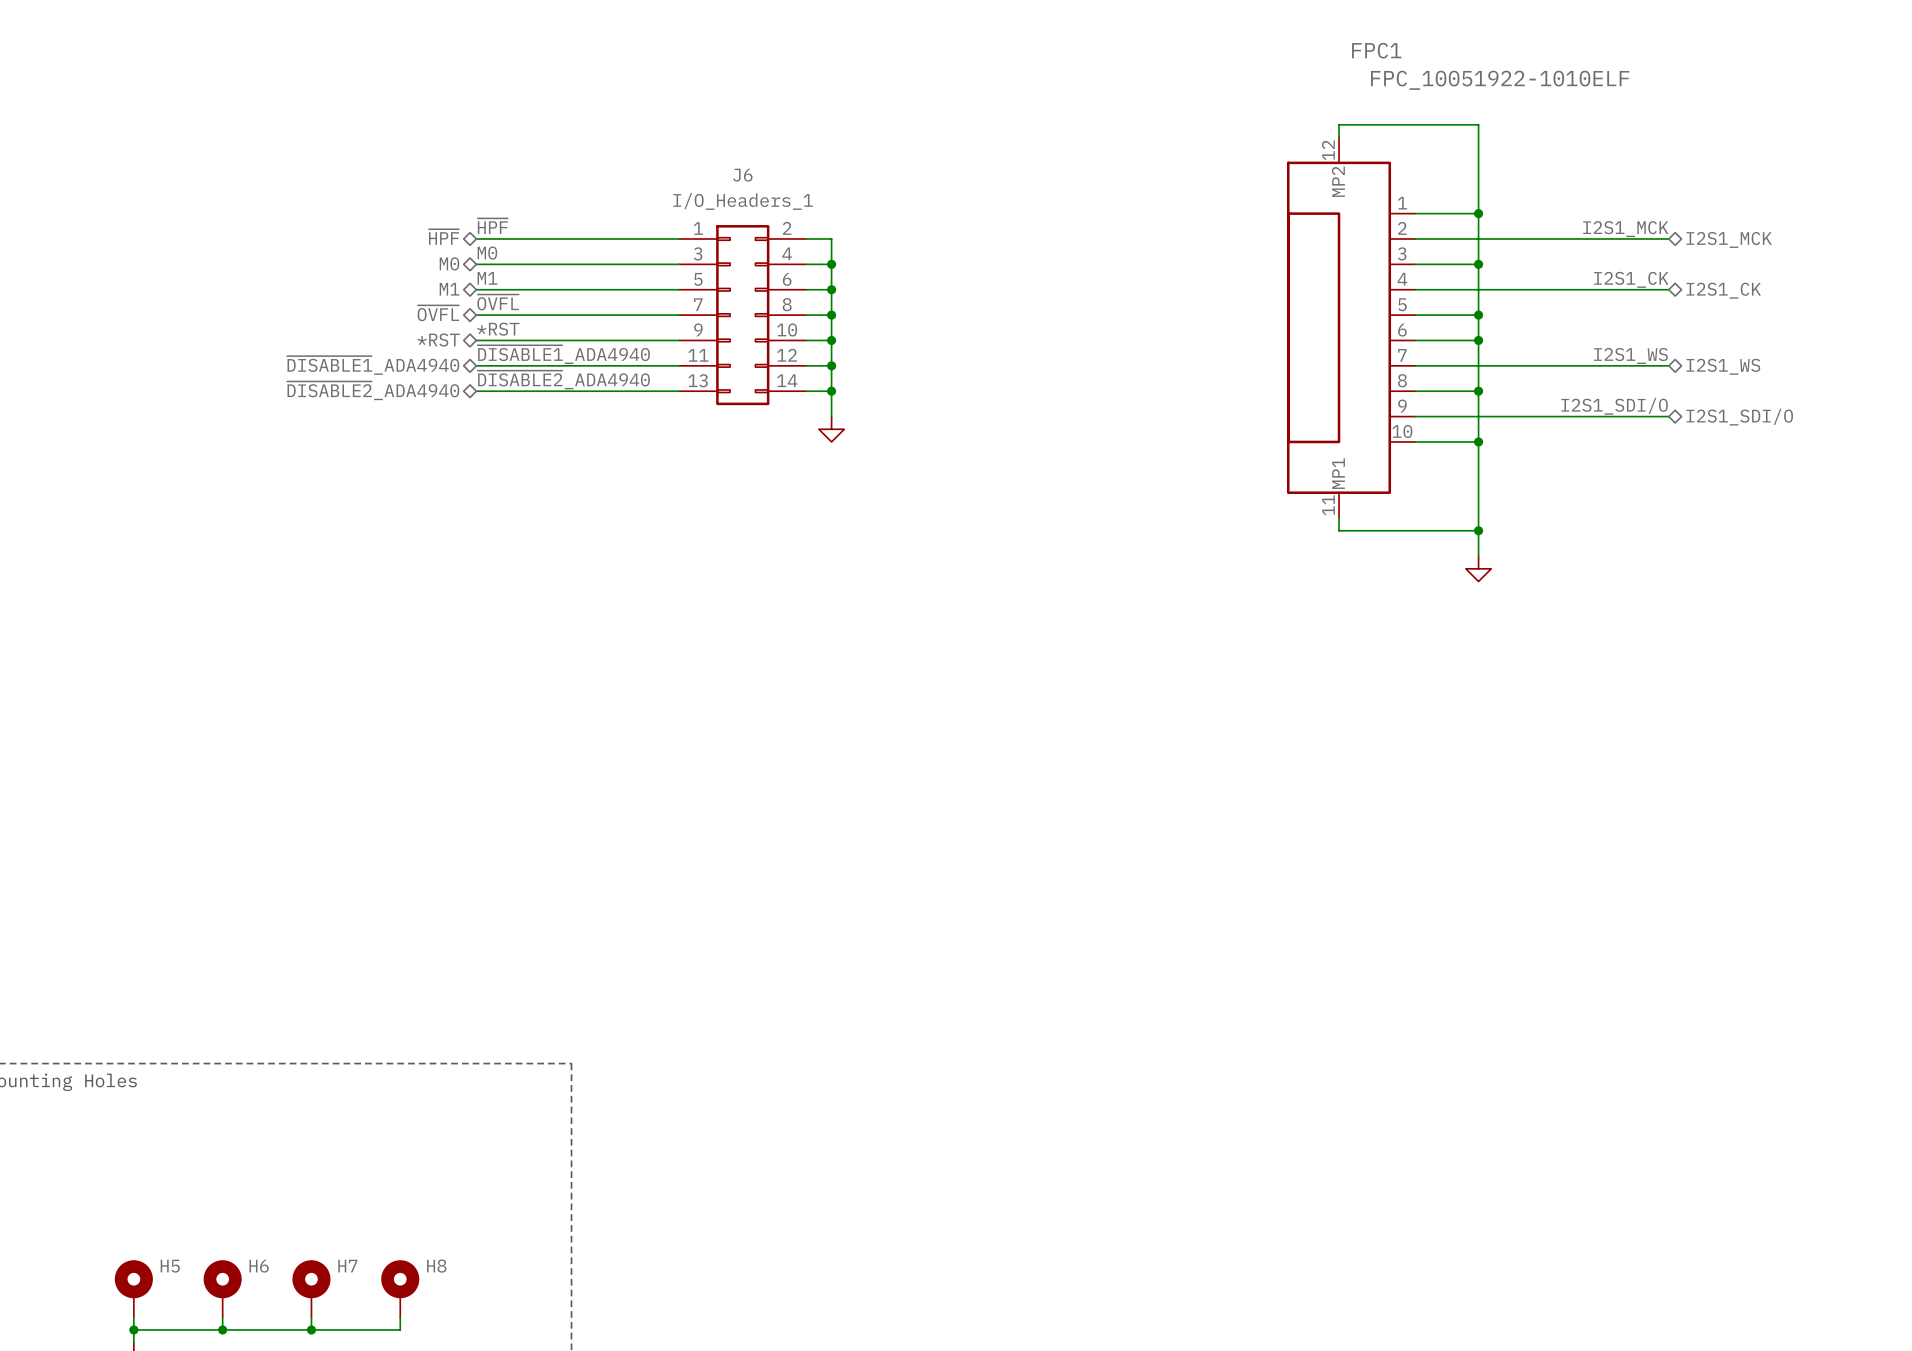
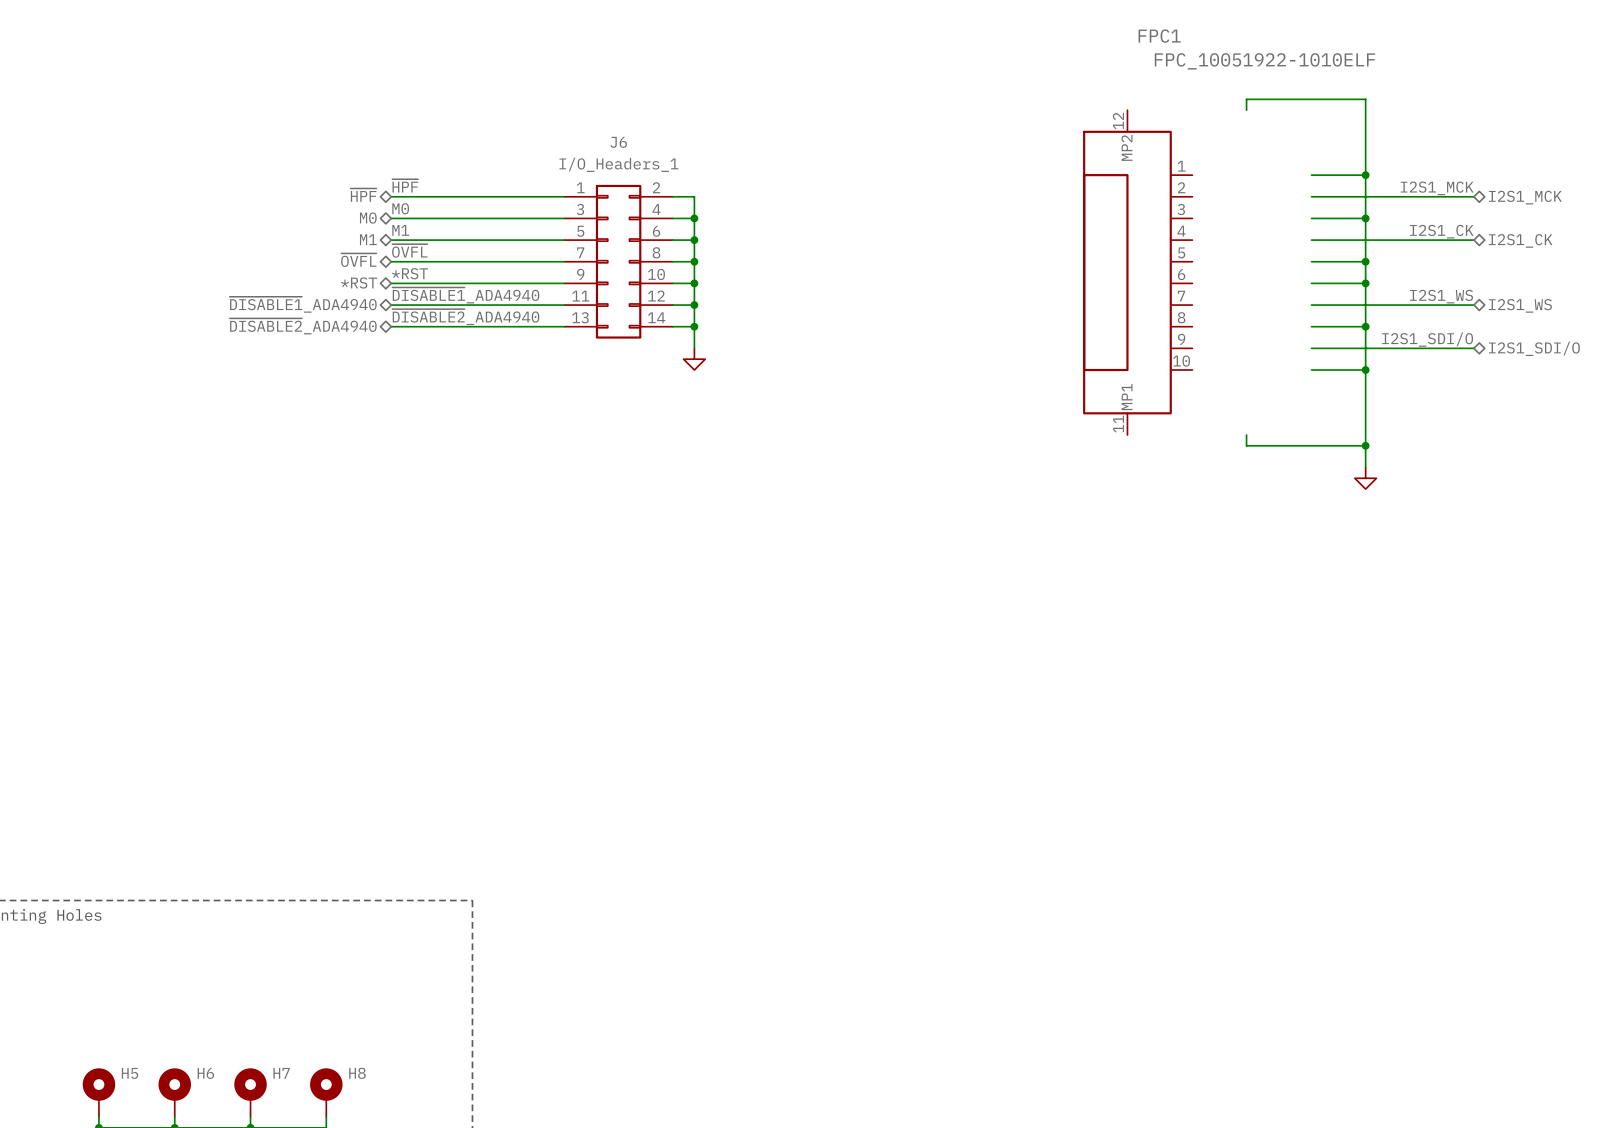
wire: (1478, 124) (1339, 124) (1339, 137) -> (1246, 99) (1365, 99) (1365, 467)
wire: (1478, 137) (1478, 518) -> none
wire: (1415, 213) (1478, 213) -> (1311, 175) (1365, 175)
junction: (1478, 213) -> none
junction: none -> (1365, 175)
label position: I2S1_MCK (1625, 229) -> I2S1_MCK (1437, 188)
wire: (1415, 238) (1554, 238) -> none
wire: none -> (1408, 196) (1473, 196)
hierarchical label position: I2S1_MCK (1729, 239) -> I2S1_MCK (1525, 197)
wire: (1415, 264) (1478, 264) -> (1311, 218) (1365, 218)
junction: (1478, 264) -> none
junction: none -> (1365, 218)
label position: I2S1_CK (1631, 279) -> I2S1_CK (1441, 231)
wire: (1415, 289) (1554, 289) -> none
wire: none -> (1408, 240) (1473, 240)
hierarchical label position: I2S1_CK (1723, 290) -> I2S1_CK (1520, 240)
wire: (1415, 315) (1478, 315) -> (1311, 261) (1365, 261)
junction: (1478, 315) -> none
junction: none -> (1365, 261)
wire: (1415, 340) (1478, 340) -> (1311, 283) (1365, 283)
junction: (1478, 340) -> none
junction: none -> (1365, 283)
label position: I2S1_WS (1630, 355) -> I2S1_WS (1441, 296)
wire: (1415, 365) (1554, 365) -> none
wire: none -> (1408, 305) (1473, 305)
hierarchical label position: I2S1_WS (1723, 366) -> I2S1_WS (1520, 305)
wire: (1415, 391) (1478, 391) -> (1311, 326) (1365, 326)
junction: (1478, 391) -> none
junction: none -> (1365, 326)
label position: I2S1_SDI/O (1614, 406) -> I2S1_SDI/O (1427, 339)
wire: (1415, 416) (1554, 416) -> (1246, 445) (1365, 445)
wire: none -> (1408, 348) (1473, 348)
hierarchical label position: I2S1_SDI/O (1739, 417) -> I2S1_SDI/O (1534, 348)
wire: (1415, 441) (1478, 441) -> (1311, 370) (1365, 370)
junction: (1478, 441) -> none
junction: none -> (1365, 370)
wire: (1339, 518) (1339, 530) (1478, 530) (1478, 556) -> none
junction: (1478, 530) -> none
junction: none -> (1365, 445)
power symbol position: (1478, 568) -> (1365, 478)

